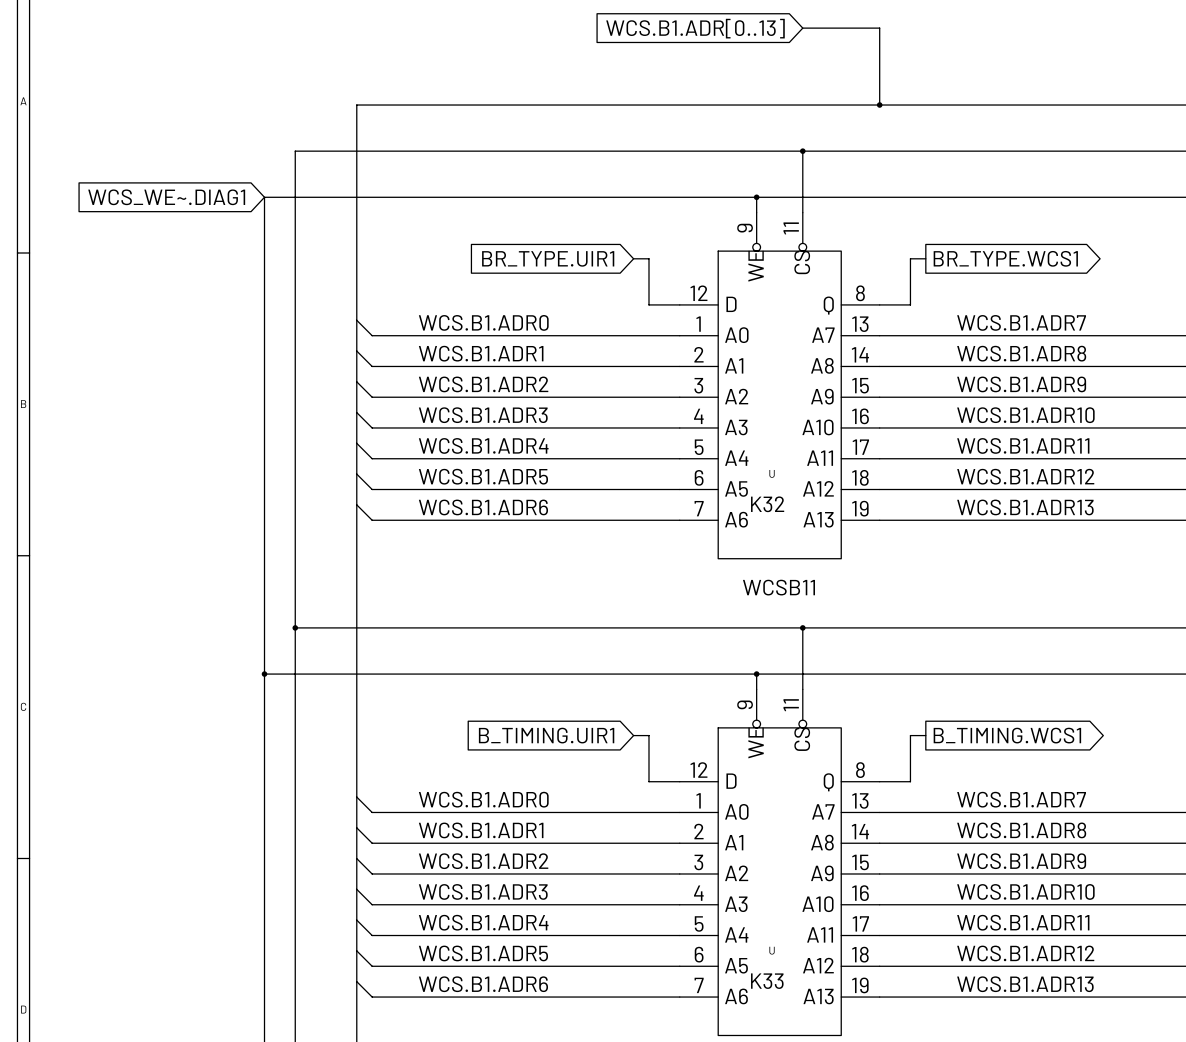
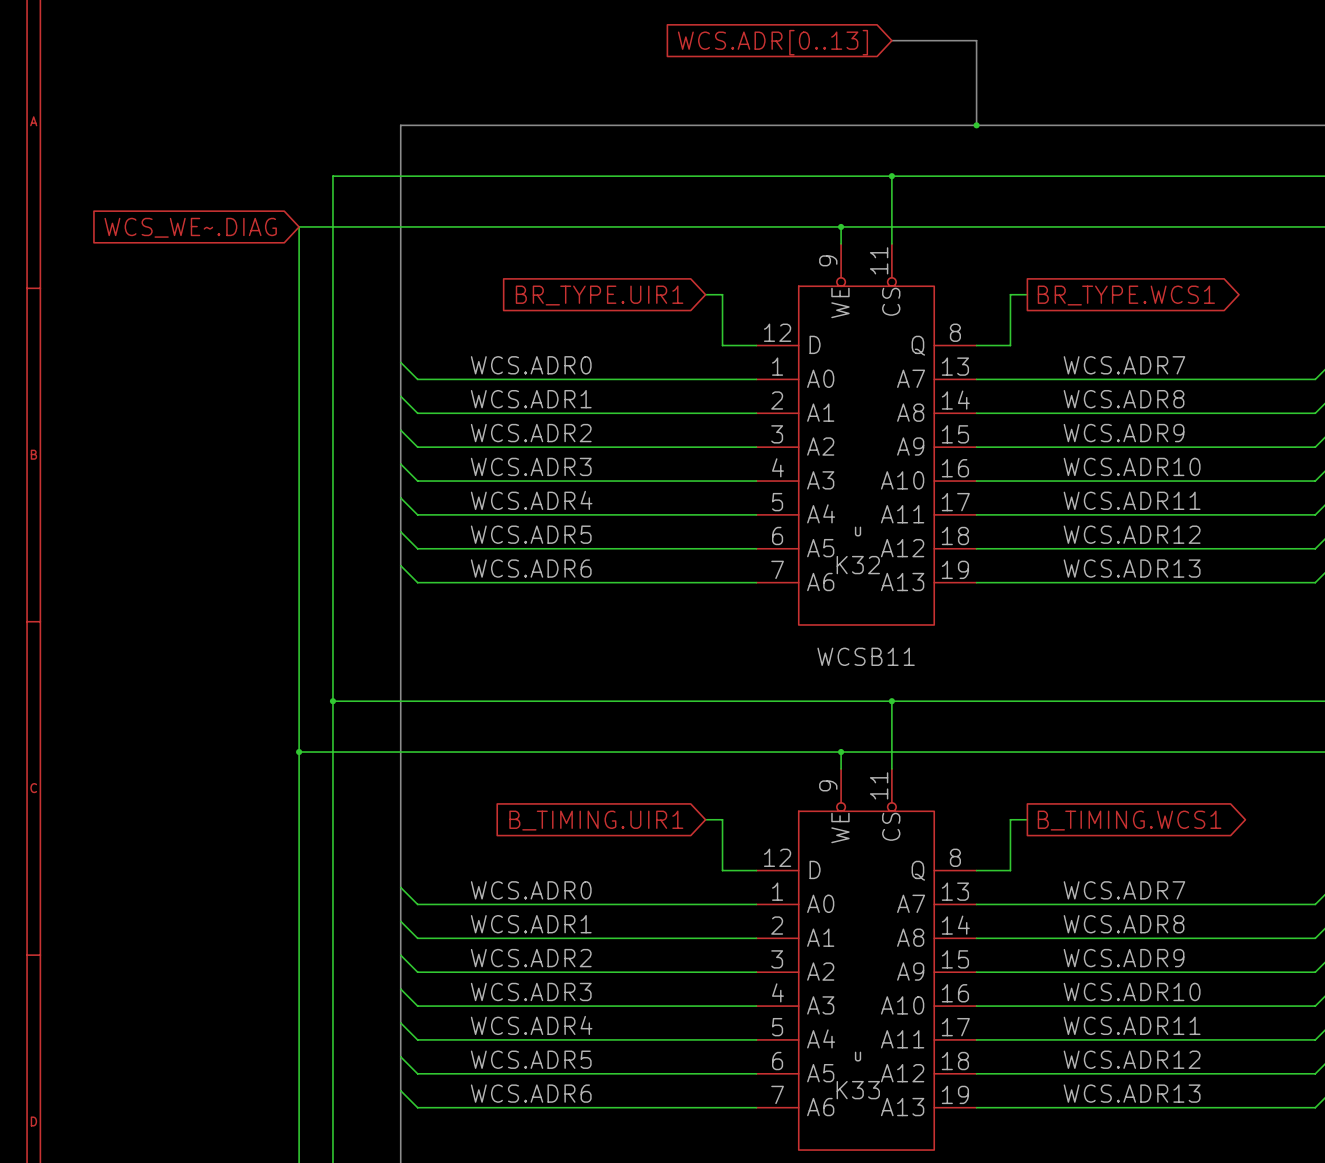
global label: WCS.B1.ADR[0..13] (695, 28) -> WCS.ADR[0..13] (772, 42)
global label: WCS_WE~.DIAG1 (166, 197) -> WCS_WE~.DIAG (190, 227)
label: WCS.B1.ADR0 (483, 322) -> WCS.ADR0 (531, 365)
label: WCS.B1.ADR7 (1021, 322) -> WCS.ADR7 (1124, 365)
label: WCS.B1.ADR1 (481, 353) -> WCS.ADR1 (531, 399)
label: WCS.B1.ADR8 (1021, 353) -> WCS.ADR8 (1124, 399)
label: WCS.B1.ADR2 (483, 384) -> WCS.ADR2 (531, 433)
label: WCS.B1.ADR9 (1021, 384) -> WCS.ADR9 (1124, 433)
label: WCS.B1.ADR3 (483, 415) -> WCS.ADR3 (531, 466)
label: WCS.B1.ADR10 (1025, 415) -> WCS.ADR10 (1132, 466)
label: WCS.B1.ADR4 (483, 445) -> WCS.ADR4 (531, 500)
label: WCS.B1.ADR11 (1023, 445) -> WCS.ADR11 (1132, 500)
label: WCS.B1.ADR5 (483, 476) -> WCS.ADR5 (531, 534)
label: WCS.B1.ADR12 (1025, 476) -> WCS.ADR12 (1132, 534)
label: WCS.B1.ADR6 (483, 507) -> WCS.ADR6 (531, 568)
label: WCS.B1.ADR13 (1025, 507) -> WCS.ADR13 (1132, 568)
label: WCS.B1.ADR0 (483, 799) -> WCS.ADR0 (531, 890)
label: WCS.B1.ADR7 (1021, 799) -> WCS.ADR7 (1124, 890)
label: WCS.B1.ADR1 (481, 830) -> WCS.ADR1 (531, 924)
label: WCS.B1.ADR8 (1021, 830) -> WCS.ADR8 (1124, 924)
label: WCS.B1.ADR2 (483, 861) -> WCS.ADR2 (531, 958)
label: WCS.B1.ADR9 (1021, 861) -> WCS.ADR9 (1124, 958)
label: WCS.B1.ADR3 (483, 891) -> WCS.ADR3 (531, 991)
label: WCS.B1.ADR10 (1025, 891) -> WCS.ADR10 (1132, 991)
label: WCS.B1.ADR4 (483, 922) -> WCS.ADR4 (531, 1025)
label: WCS.B1.ADR11 (1023, 922) -> WCS.ADR11 (1132, 1025)
label: WCS.B1.ADR5 (483, 953) -> WCS.ADR5 (531, 1059)
label: WCS.B1.ADR12 (1025, 953) -> WCS.ADR12 (1132, 1059)
label: WCS.B1.ADR6 (483, 984) -> WCS.ADR6 (531, 1093)
label: WCS.B1.ADR13 (1025, 984) -> WCS.ADR13 (1132, 1093)

